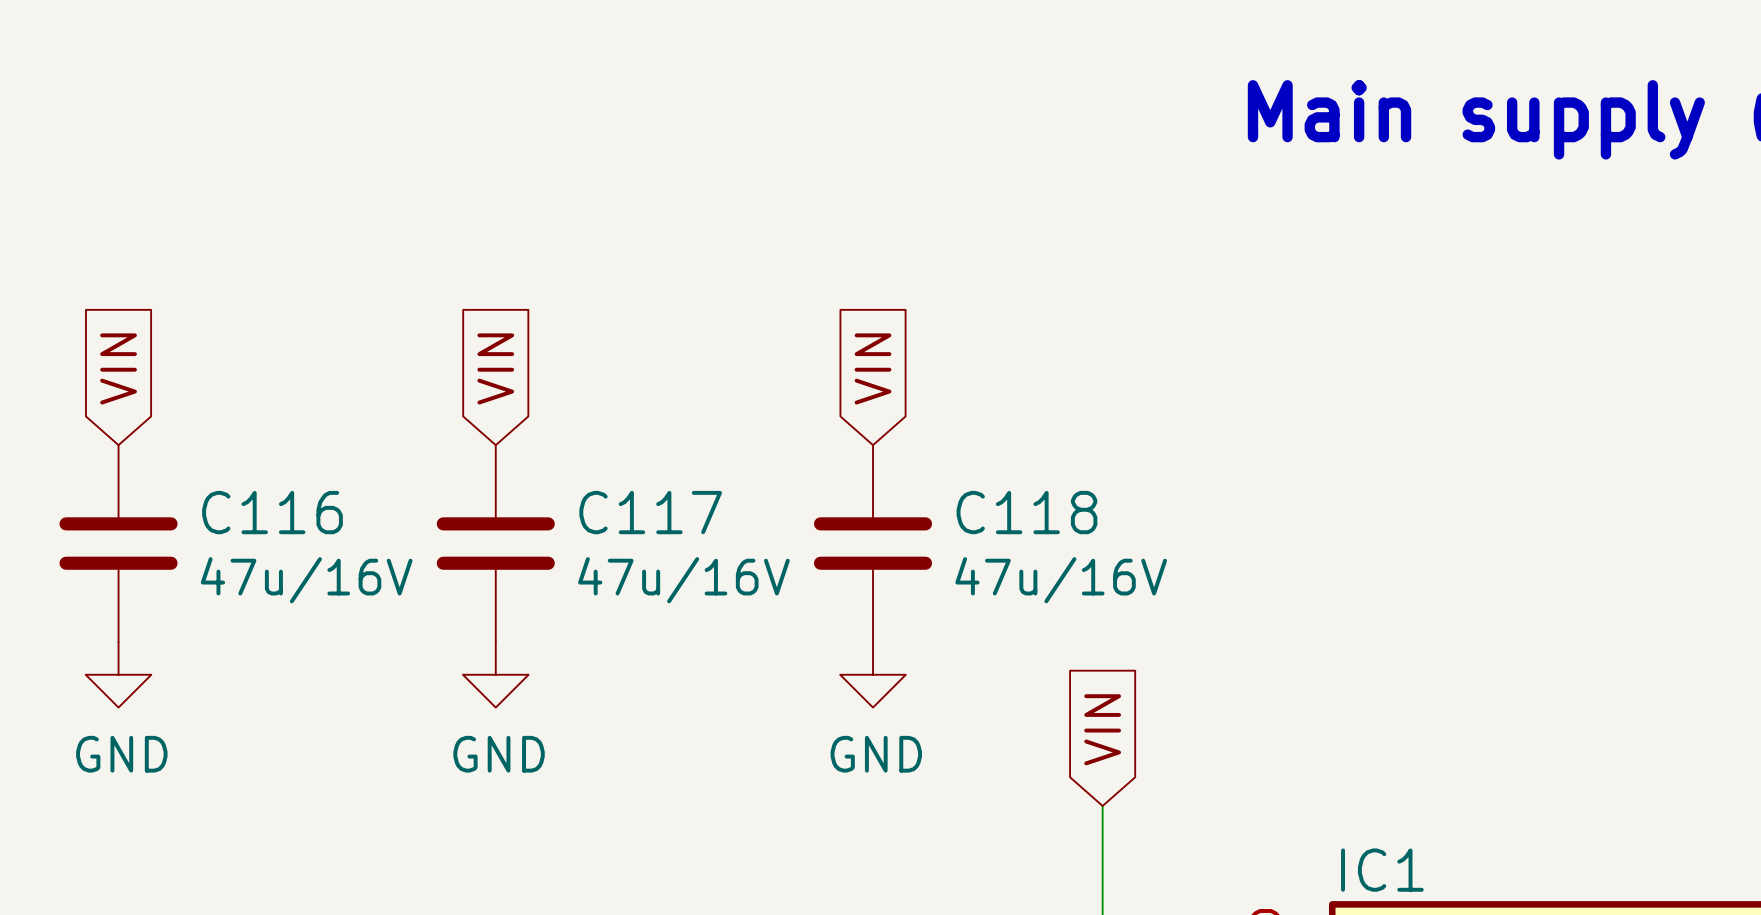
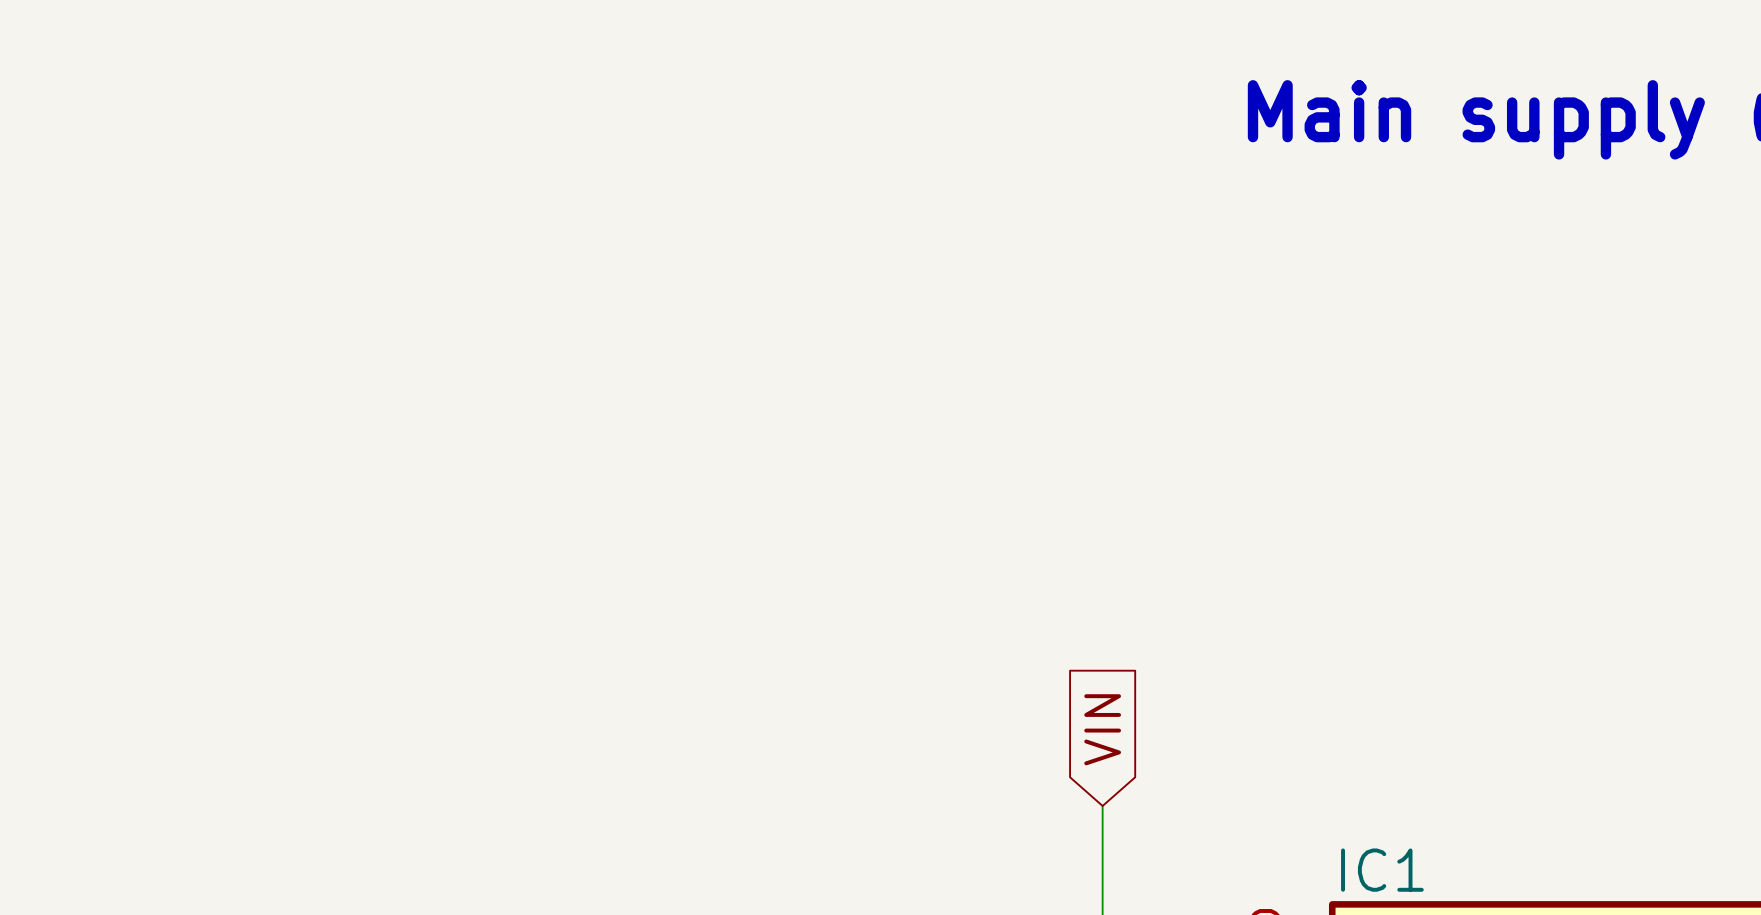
global label: VIN (118, 368) -> none
global label: VIN (495, 368) -> none
global label: VIN (873, 368) -> none
C116: (118, 543) -> none
C117: (495, 543) -> none
C118: (873, 543) -> none
power symbol: GND (118, 674) -> none
power symbol: GND (495, 674) -> none
power symbol: GND (873, 674) -> none

